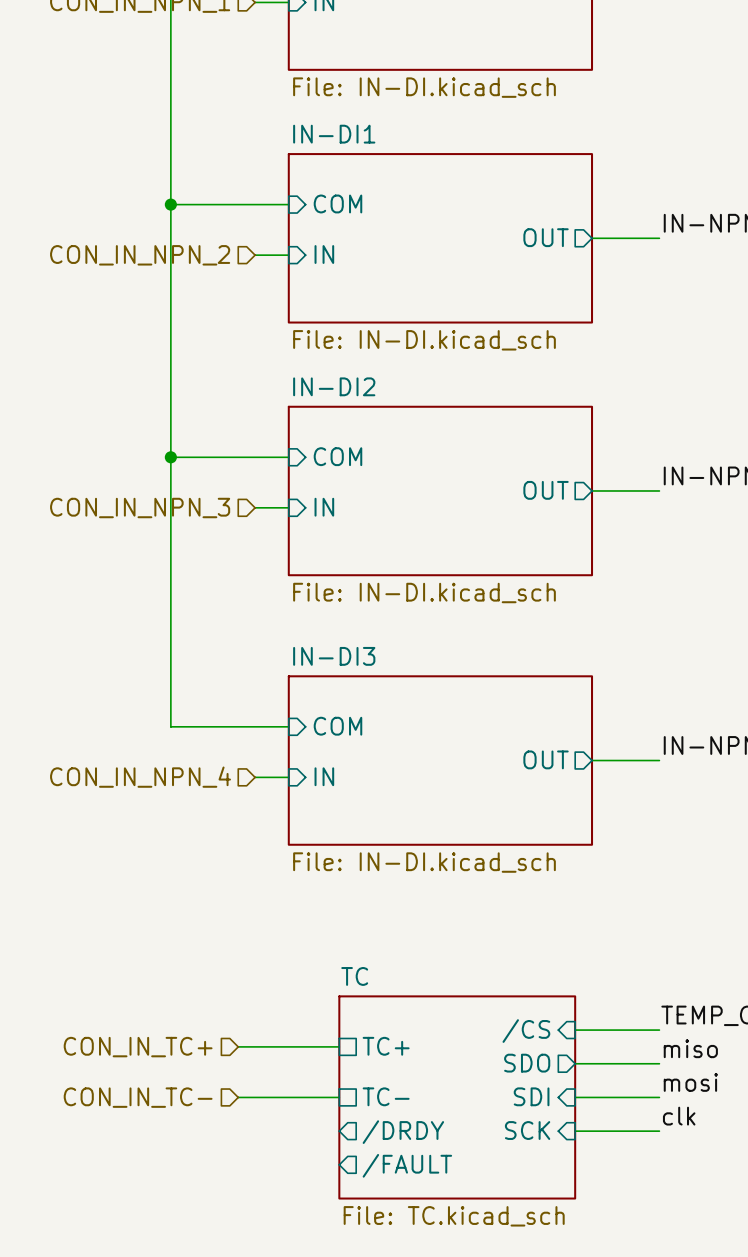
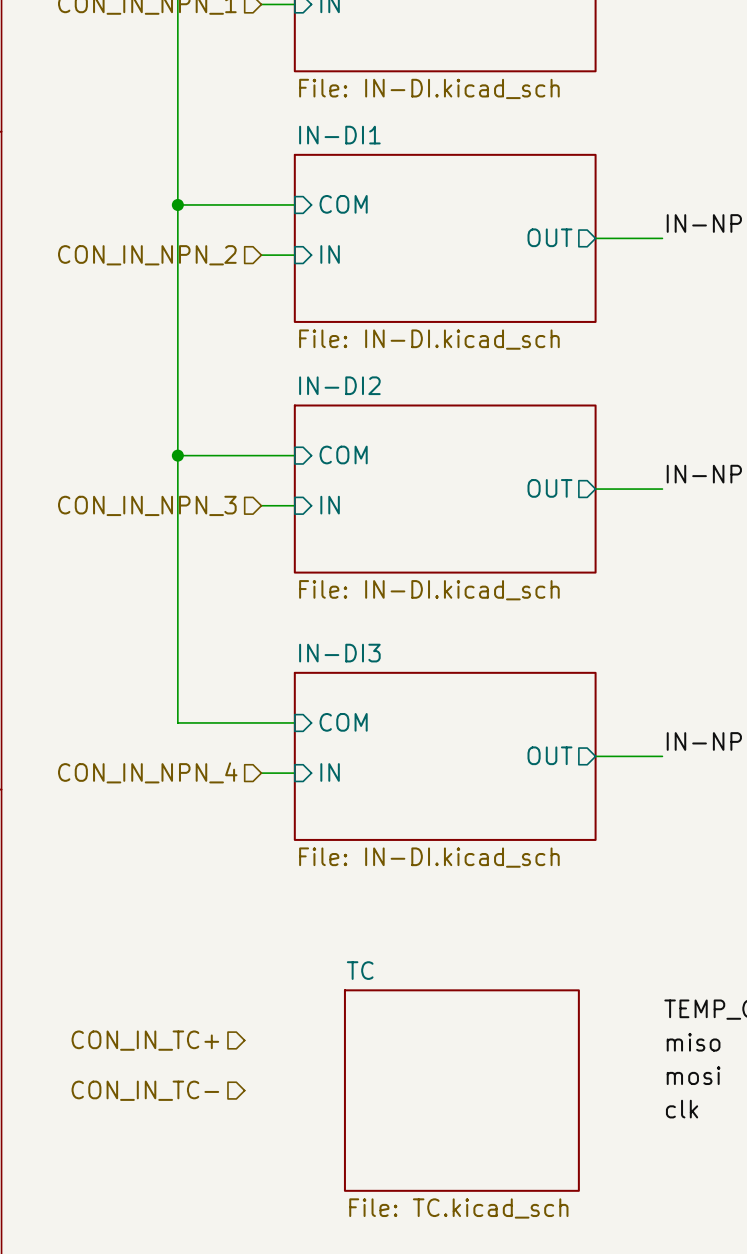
wire: (575, 1030) (659, 1030) -> none
sheet pin: /CS (526, 1031) -> none
wire: (238, 1046) (339, 1046) -> none
sheet pin: TC+ (386, 1046) -> none
sheet pin: SDO (527, 1063) -> none
wire: (575, 1063) (659, 1063) -> none
sheet pin: TC- (386, 1096) -> none
sheet pin: SDI (531, 1096) -> none
wire: (238, 1097) (339, 1097) -> none
wire: (575, 1097) (659, 1097) -> none
sheet pin: SCK (527, 1130) -> none
wire: (575, 1131) (659, 1131) -> none
sheet pin: /DRDY (403, 1132) -> none
sheet pin: /FAULT (407, 1165) -> none

